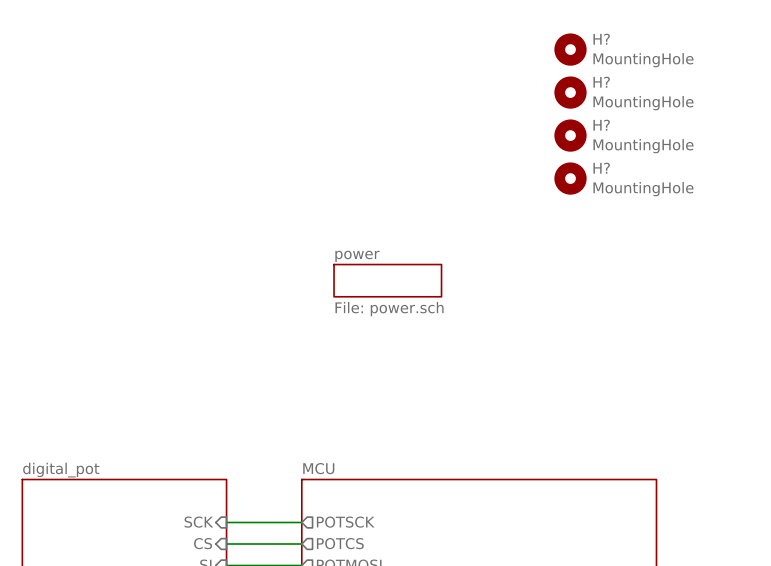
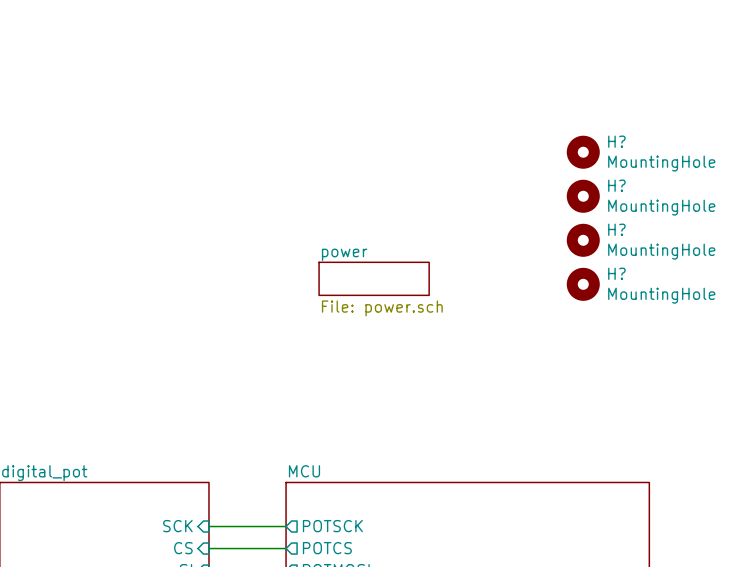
H?: MountingHole (570, 49) -> none
H?: MountingHole (570, 92) -> none
H?: MountingHole (570, 135) -> none
H?: none -> MountingHole (583, 152)
H?: MountingHole (570, 178) -> none
H?: none -> MountingHole (583, 196)
H?: none -> MountingHole (583, 240)
H?: none -> MountingHole (583, 284)

